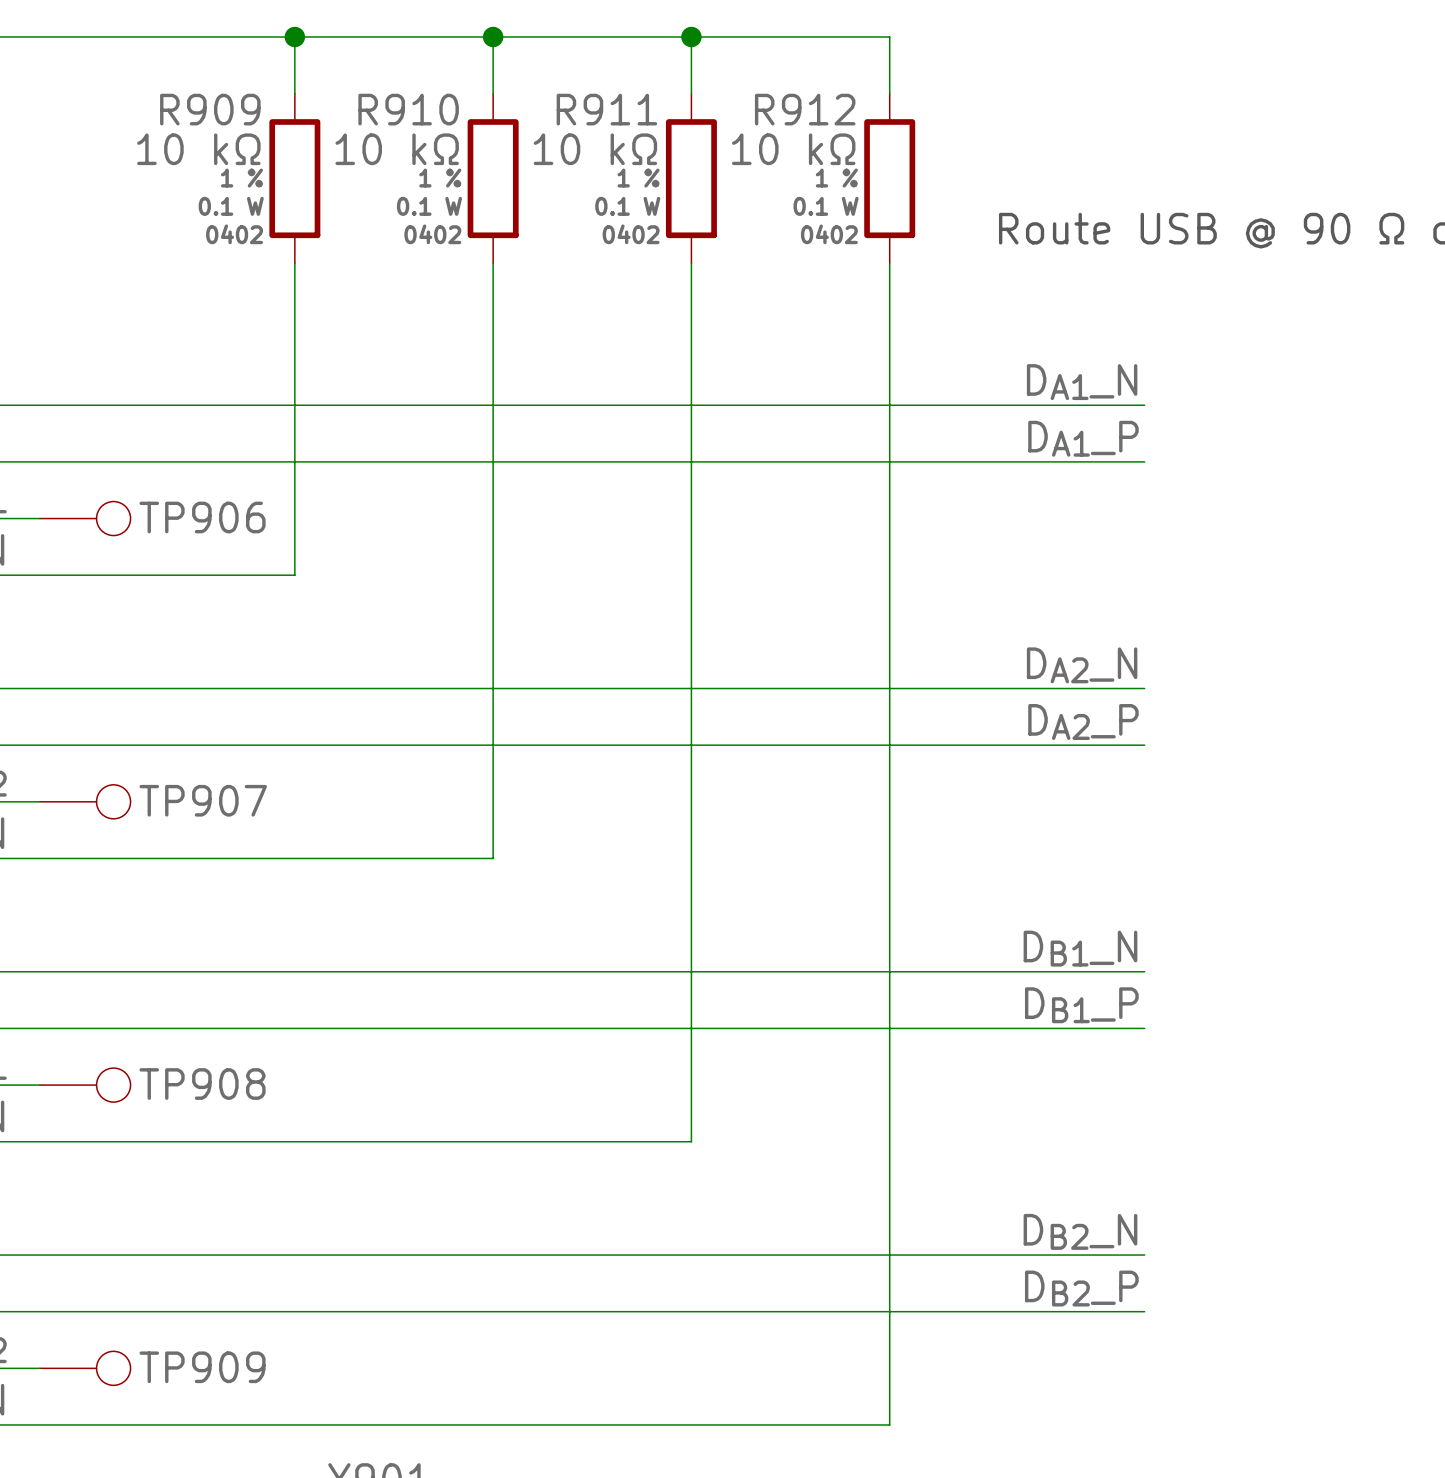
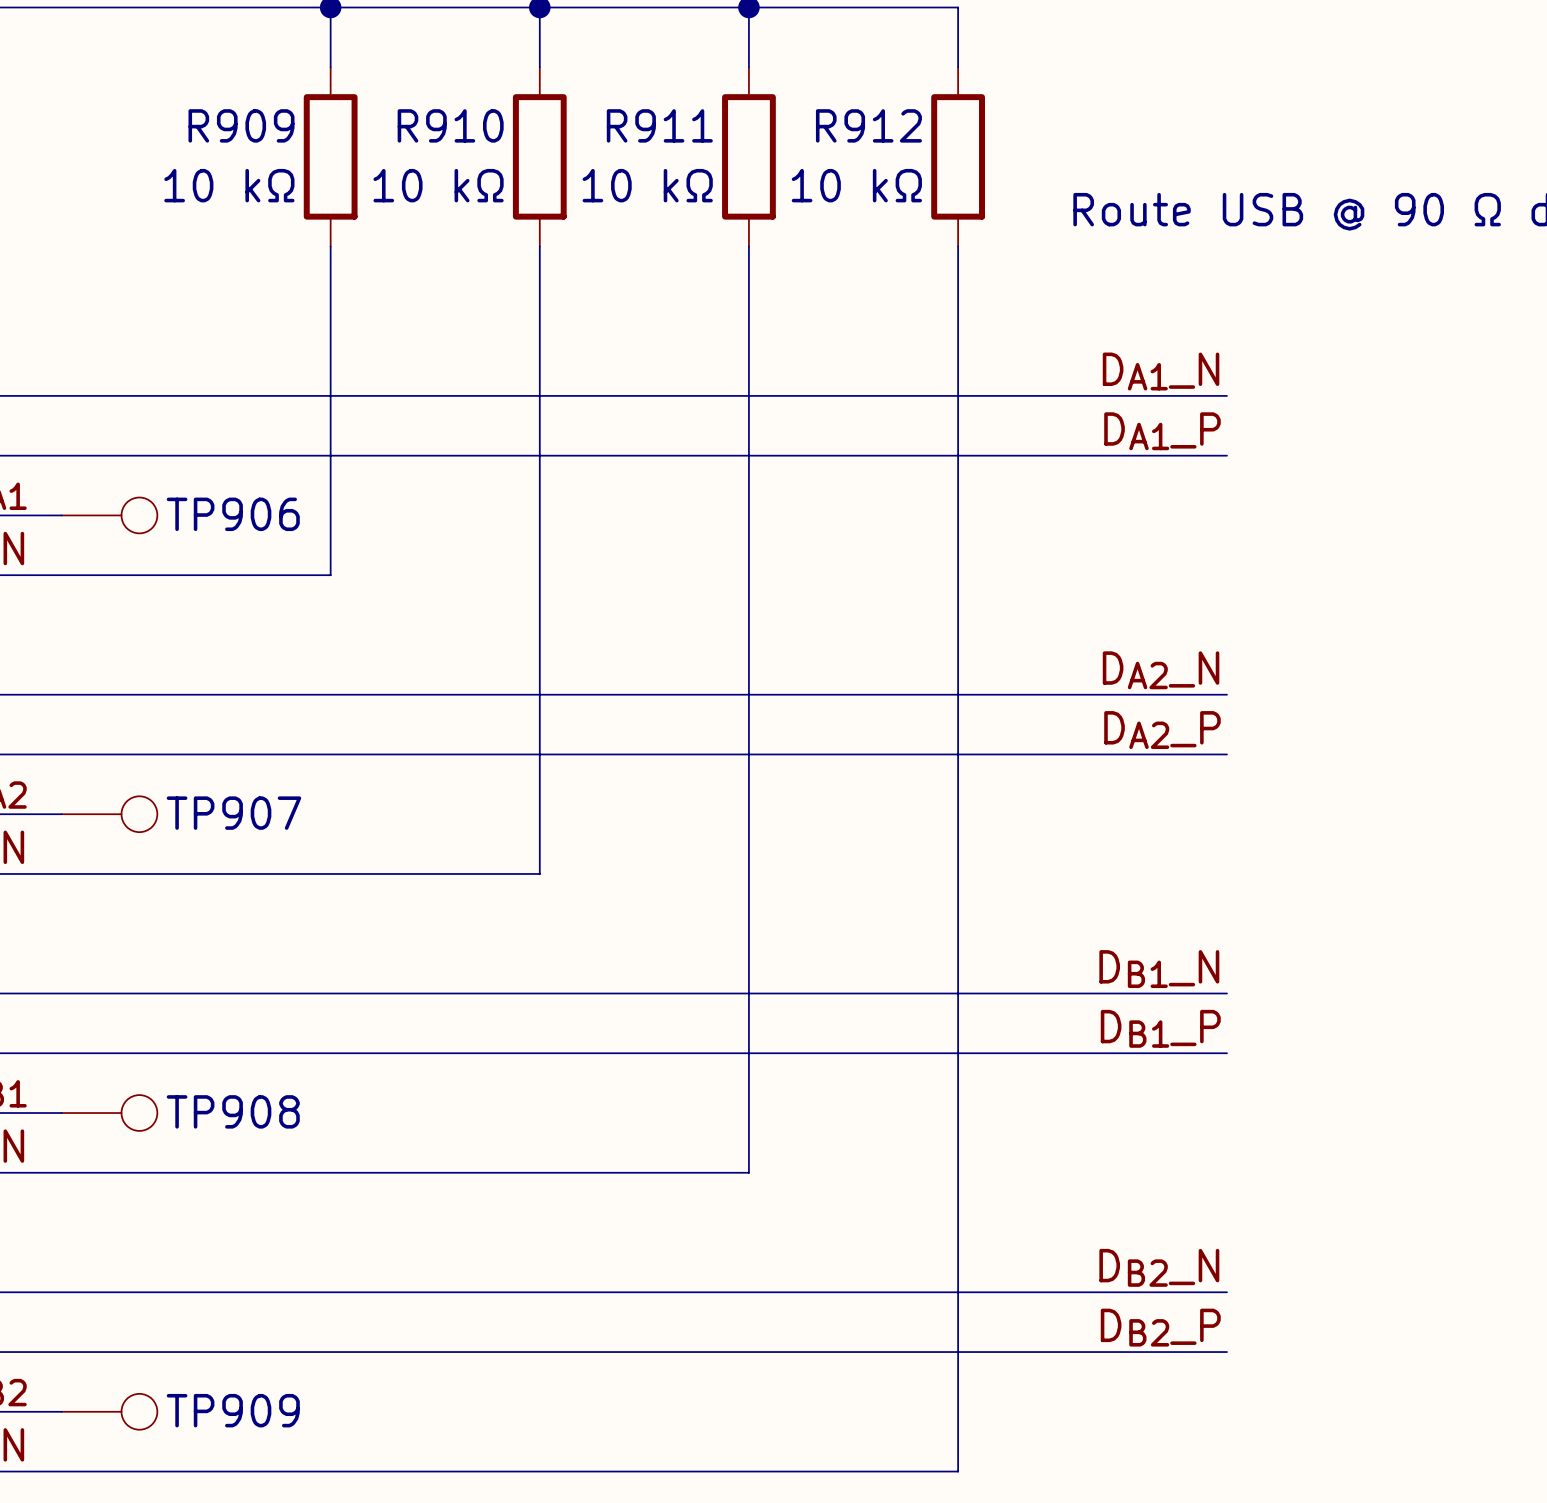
R909 name position: R909 (210, 109) -> R909 (241, 125)
R910 name position: R910 (408, 109) -> R910 (450, 125)
R911 name position: R911 (606, 109) -> R911 (659, 125)
R912 name position: R912 (805, 109) -> R912 (868, 125)
R909 value position: 10 kΩ (198, 149) -> 10 kΩ (229, 185)
R910 value position: 10 kΩ (397, 149) -> 10 kΩ (438, 185)
R911 value position: 10 kΩ (595, 149) -> 10 kΩ (647, 185)
R912 value position: 10 kΩ (793, 149) -> 10 kΩ (856, 185)
R909 text: 1 % (241, 178) -> none
R910 text: 1 % (440, 178) -> none
R911 text: 1 % (638, 178) -> none
R912 text: 1 % (836, 178) -> none
R909 text: 0.1 W (231, 206) -> none
R910 text: 0.1 W (429, 206) -> none
R911 text: 0.1 W (627, 206) -> none
R912 text: 0.1 W (826, 206) -> none
R909 text: 0402 (234, 234) -> none
R910 text: 0402 (432, 234) -> none
R911 text: 0402 (631, 234) -> none
R912 text: 0402 (829, 234) -> none

